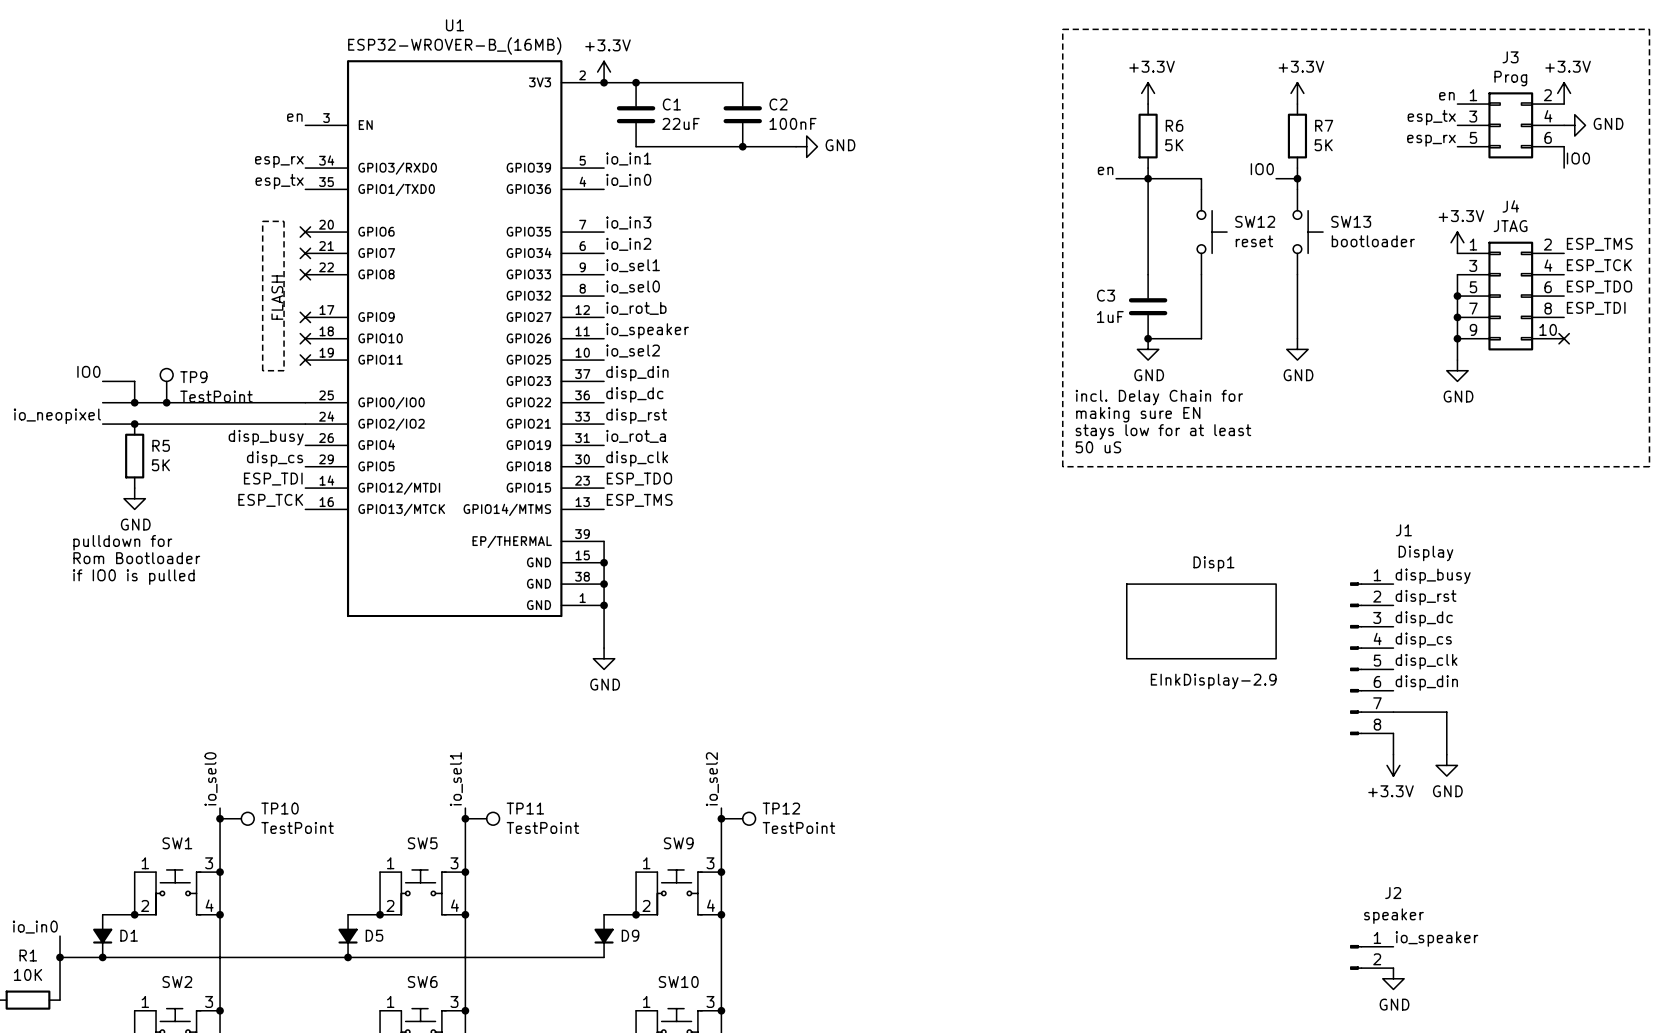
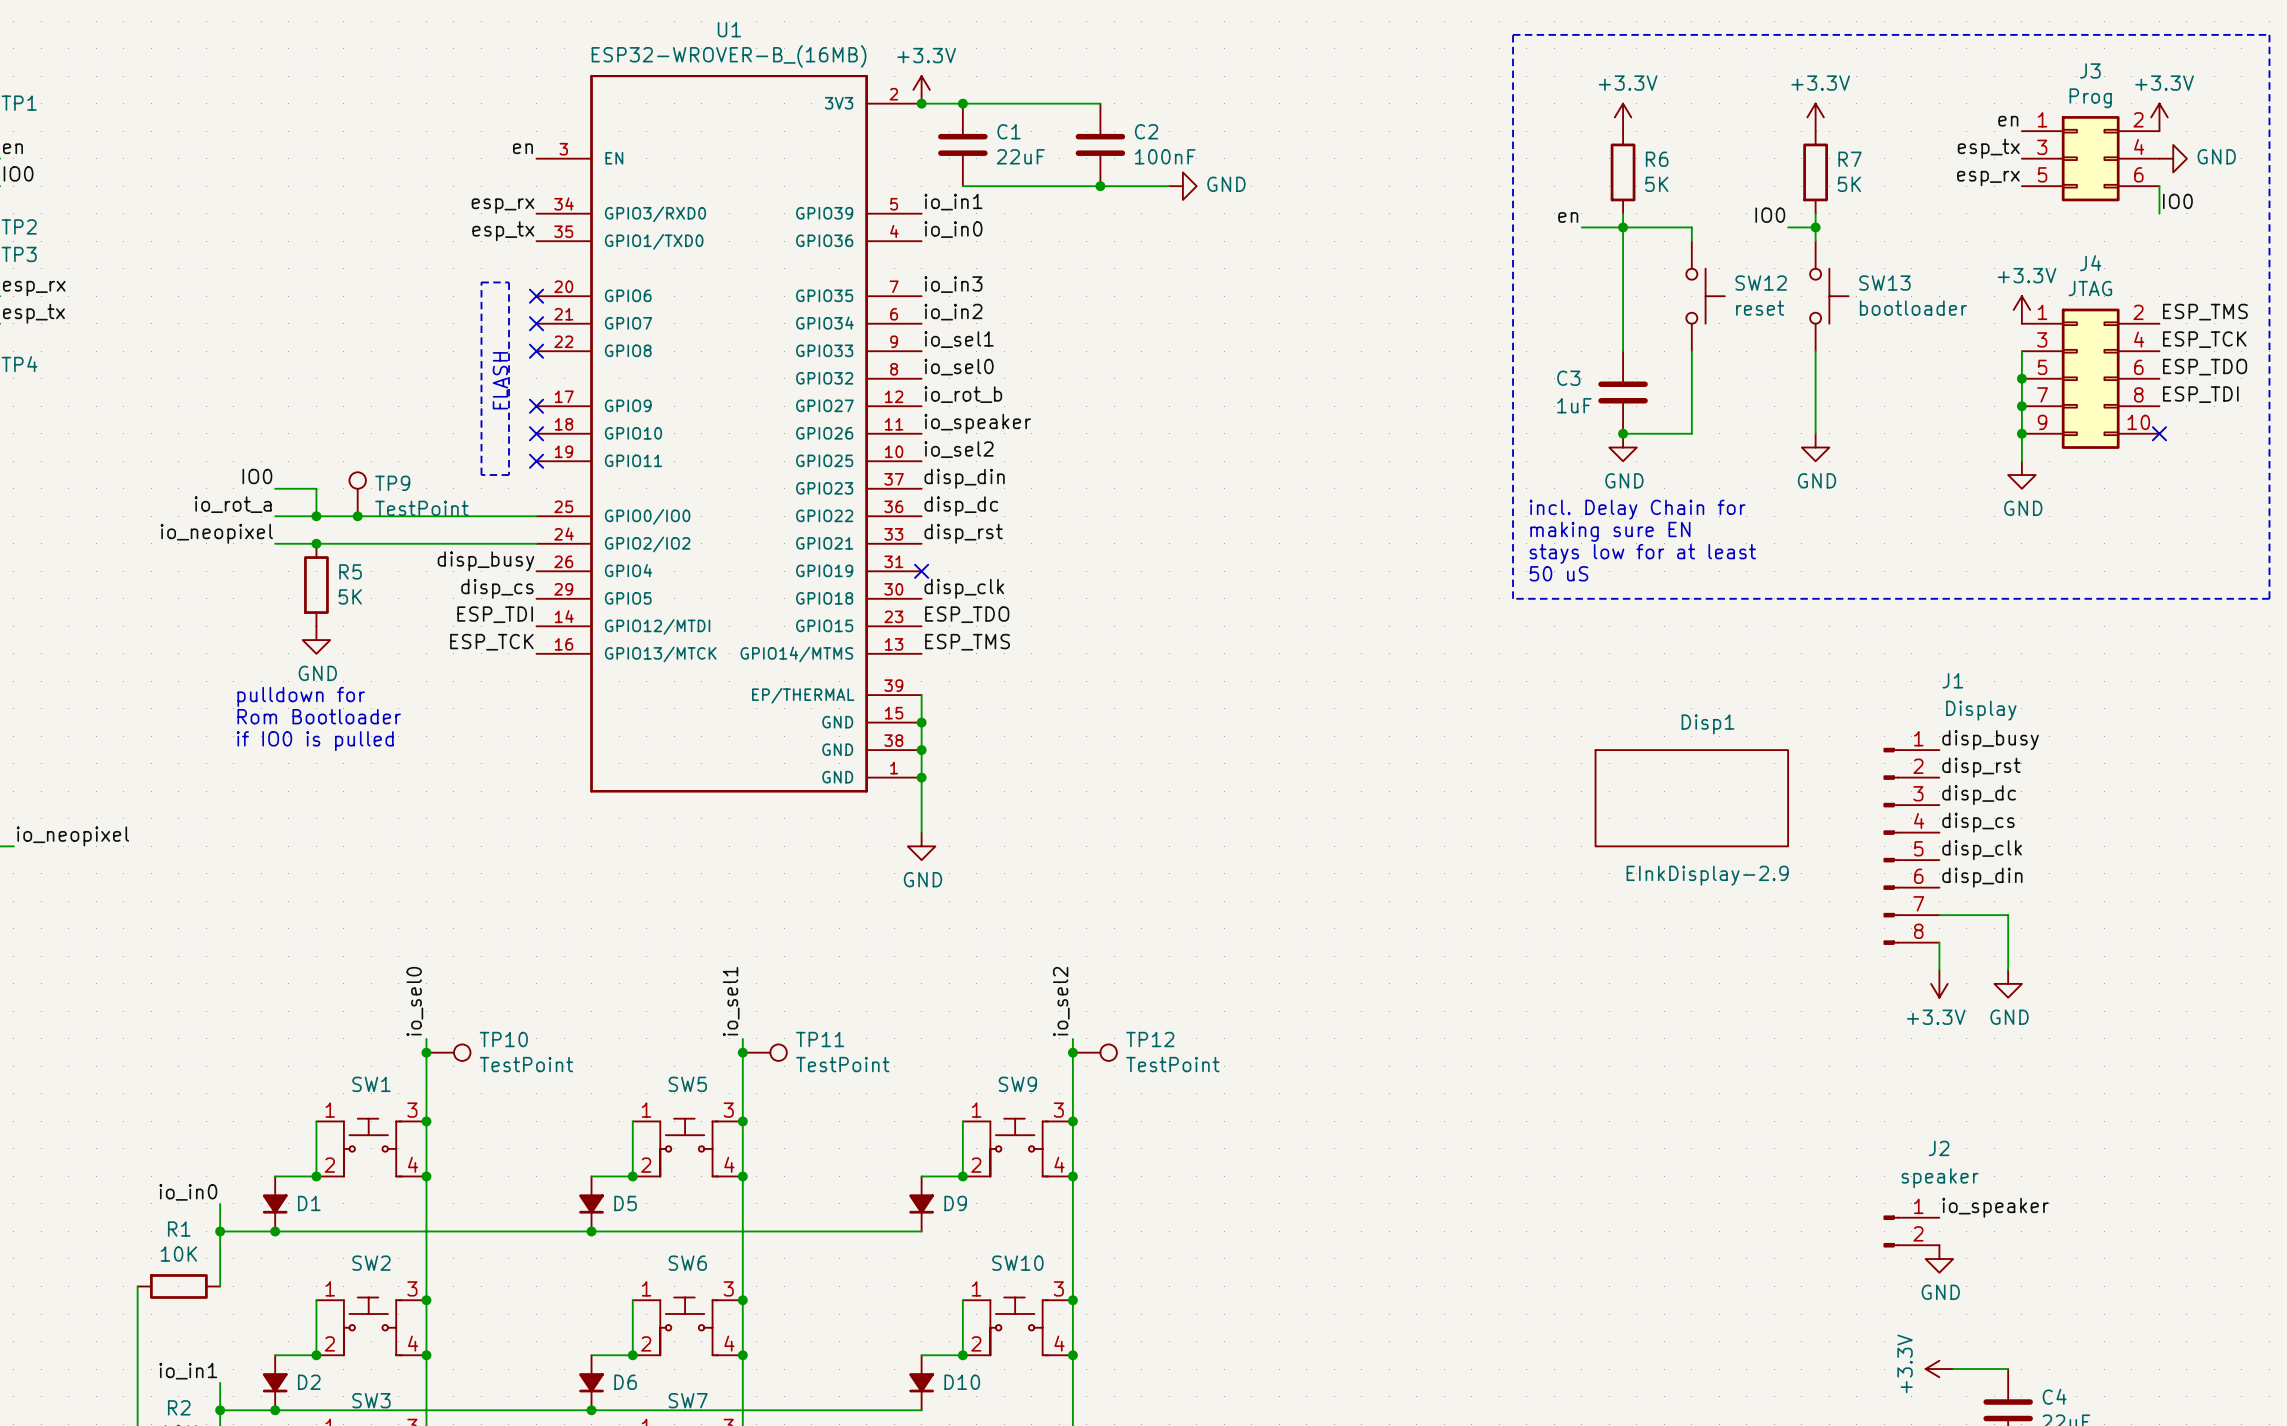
label: none -> io_rot_a (233, 504)
label: io_rot_a (636, 436) -> none
no-connect mark: none -> (921, 571)

